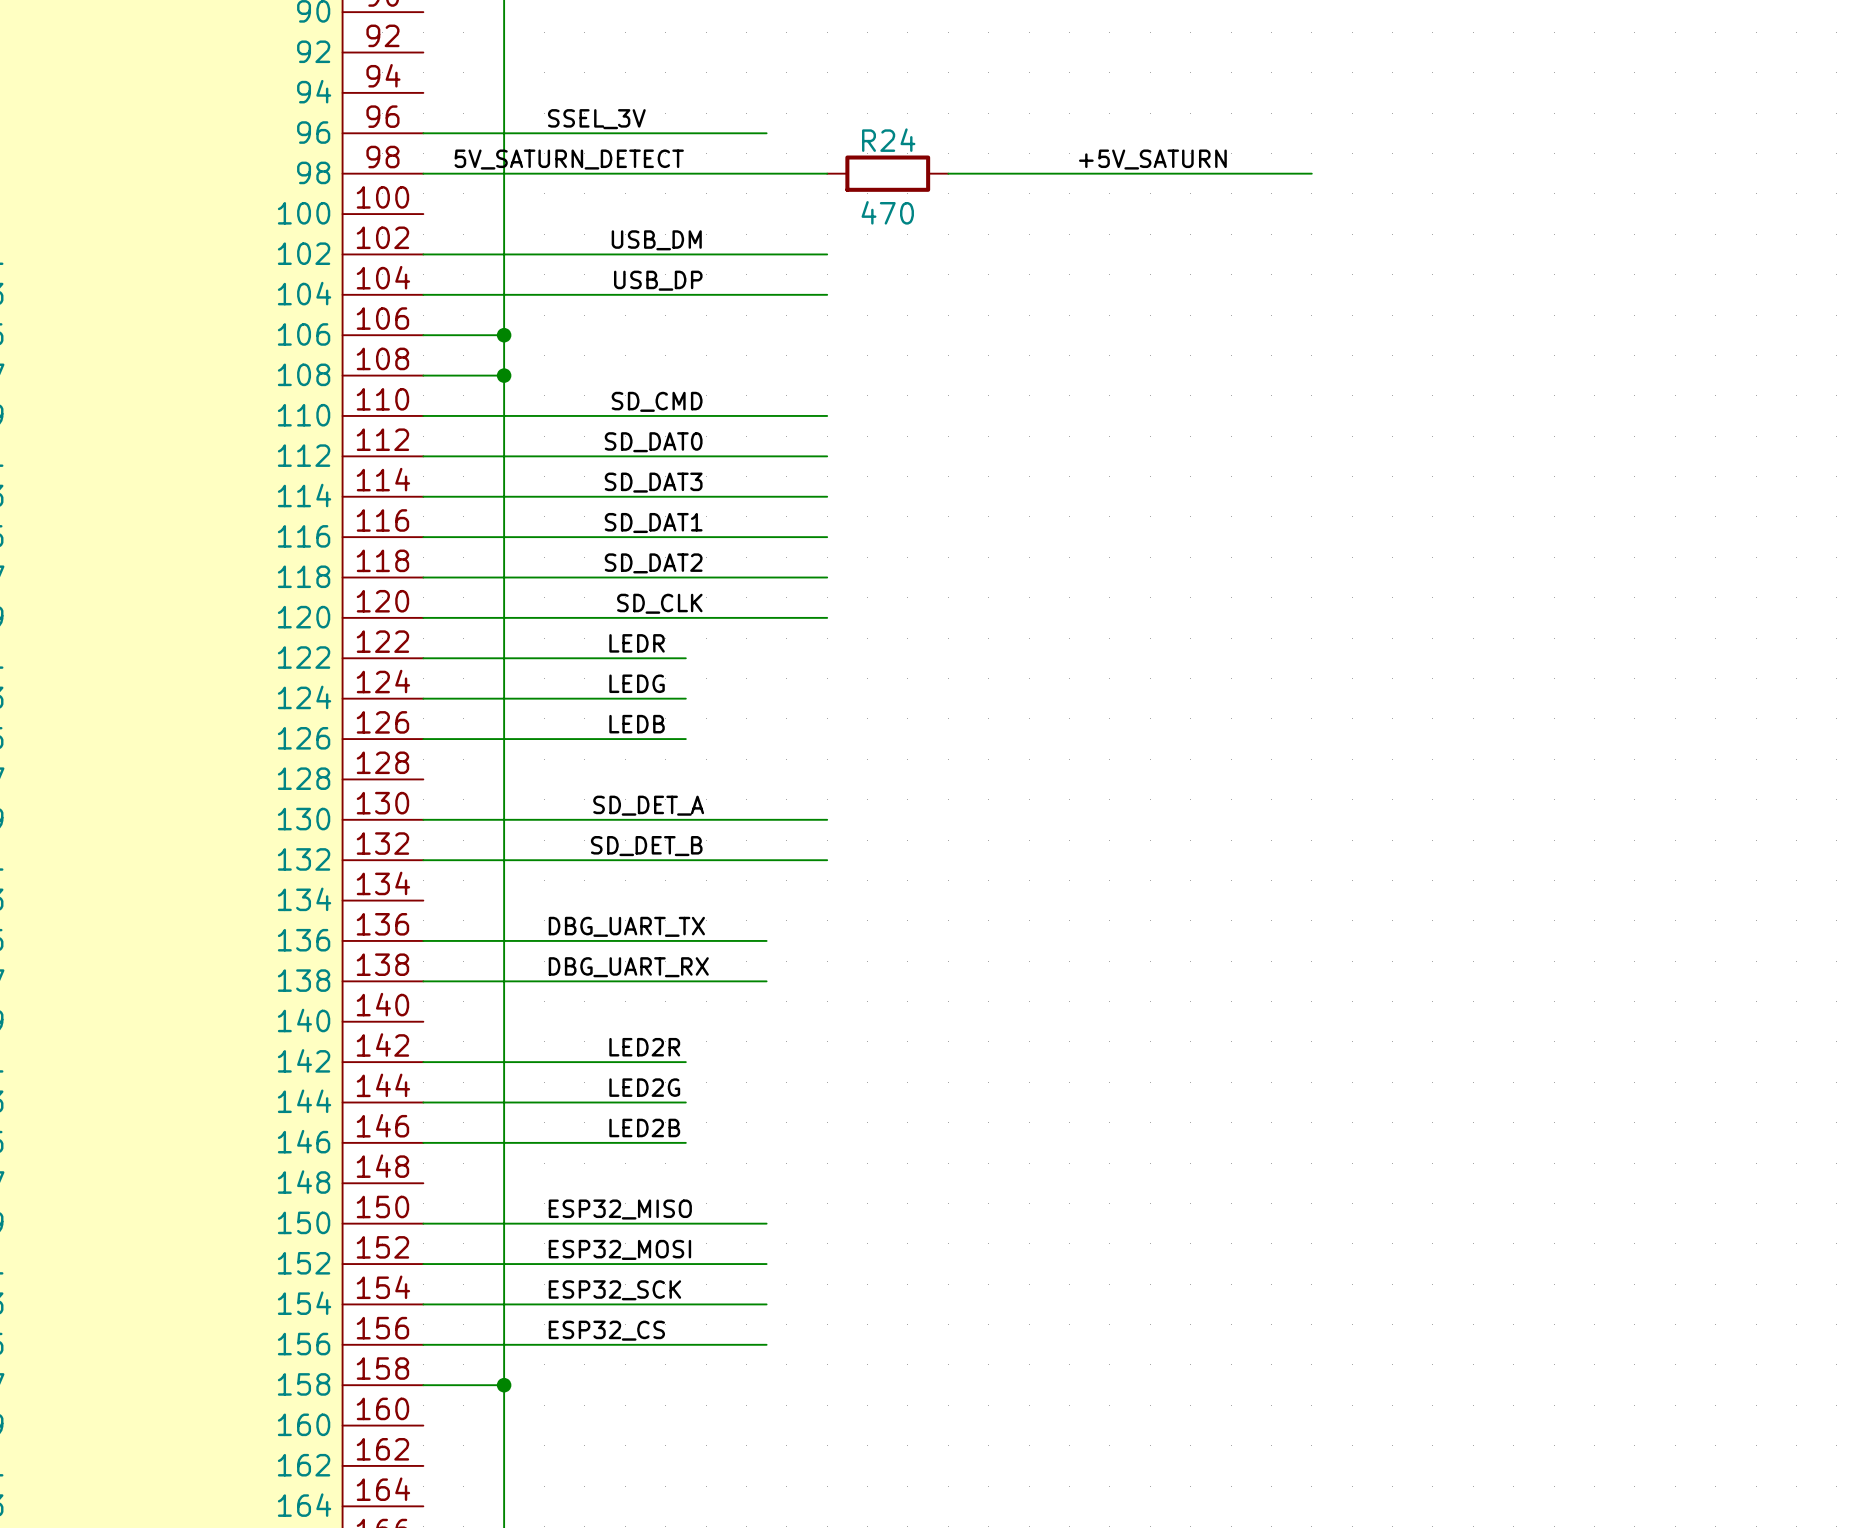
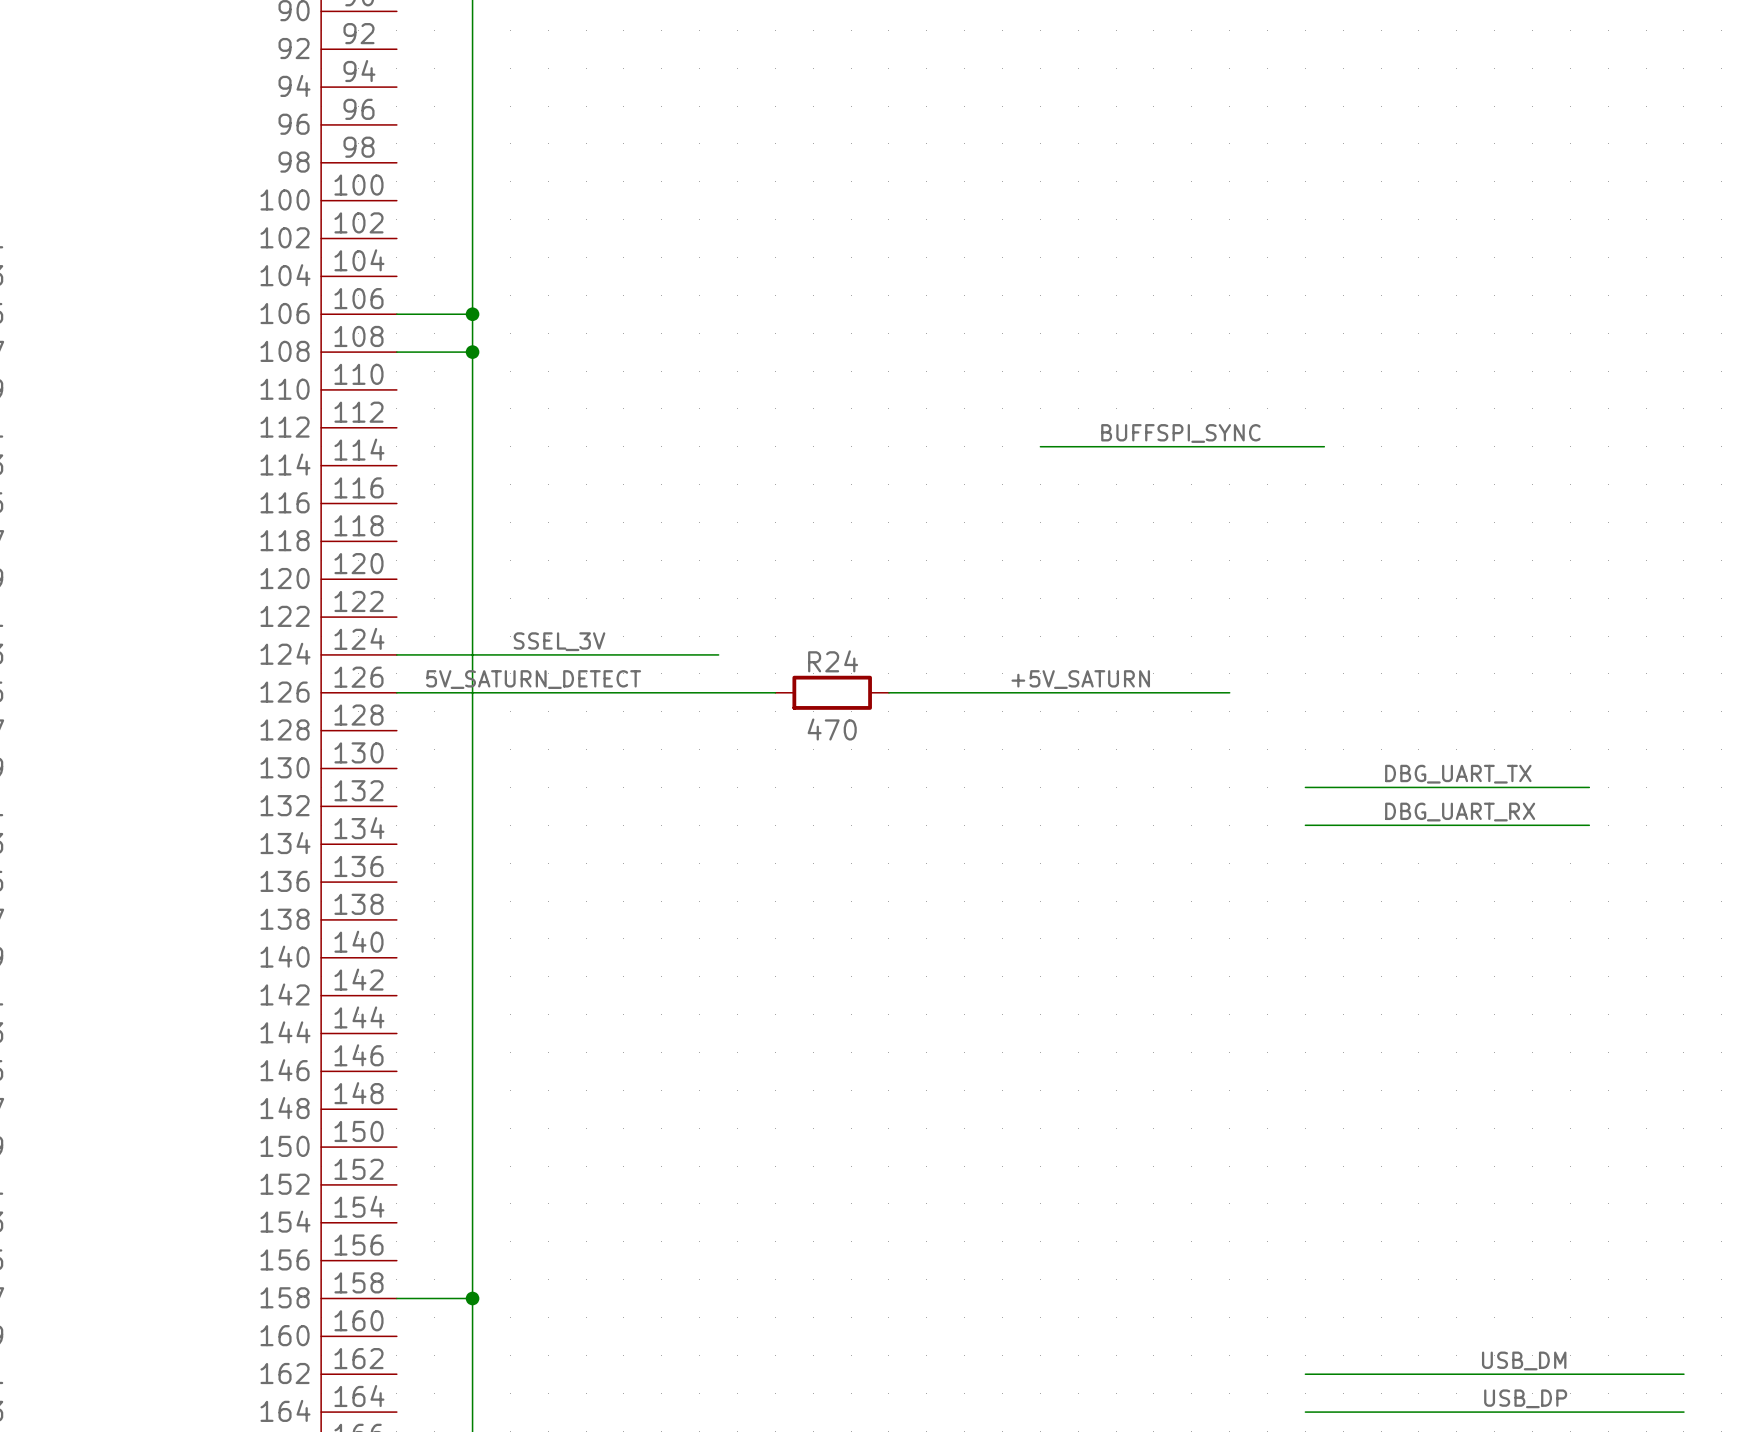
label: SSEL_3V (596, 119) -> none
wire: (423, 133) (766, 133) -> none
label: 5V_SATURN_DETECT (569, 159) -> none
label: +5V_SATURN (1152, 159) -> none
wire: (423, 173) (827, 173) -> none
R24 position: (887, 173) -> (832, 692)
wire: (948, 173) (1311, 173) -> none
label: USB_DM (656, 240) -> none
wire: (423, 254) (827, 254) -> none
label: USB_DP (658, 280) -> none
wire: (423, 294) (827, 294) -> none
label: SD_CMD (657, 401) -> none
wire: (423, 415) (827, 415) -> none
label: SD_DAT0 (653, 442) -> none
wire: (423, 456) (827, 456) -> none
label: none -> BUFFSPI_SYNC (1180, 433)
wire: none -> (1040, 446) (1324, 446)
label: SD_DAT3 (653, 482) -> none
wire: (423, 496) (827, 496) -> none
label: SD_DAT1 (653, 522) -> none
wire: (423, 537) (827, 537) -> none
label: SD_DAT2 (653, 563) -> none
wire: (423, 577) (827, 577) -> none
label: SD_CLK (659, 603) -> none
wire: (423, 617) (827, 617) -> none
label: LEDR (637, 643) -> none
wire: (423, 658) (685, 658) -> none
label: LEDG (637, 683) -> none
label: none -> SSEL_3V (559, 641)
wire: none -> (642, 654) (718, 654)
label: none -> 5V_SATURN_DETECT (533, 679)
label: LEDB (637, 724) -> none
label: none -> +5V_SATURN (1080, 679)
wire: none -> (642, 692) (775, 692)
wire: none -> (888, 692) (1229, 692)
label: SD_DET_A (648, 805) -> none
wire: (423, 819) (827, 819) -> none
label: none -> DBG_UART_TX (1458, 774)
wire: none -> (1305, 787) (1589, 787)
label: SD_DET_B (646, 846) -> none
wire: (423, 860) (827, 860) -> none
label: none -> DBG_UART_RX (1460, 812)
wire: none -> (1305, 825) (1589, 825)
label: DBG_UART_TX (626, 926) -> none
wire: (423, 940) (766, 940) -> none
label: DBG_UART_RX (628, 967) -> none
wire: (423, 981) (766, 981) -> none
label: LED2R (644, 1047) -> none
wire: (423, 1062) (685, 1062) -> none
label: LED2G (644, 1087) -> none
wire: (423, 1102) (685, 1102) -> none
label: LED2B (644, 1127) -> none
wire: (423, 1142) (685, 1142) -> none
label: ESP32_MISO (620, 1209) -> none
wire: (423, 1223) (766, 1223) -> none
label: ESP32_MOSI (619, 1249) -> none
wire: (423, 1264) (766, 1264) -> none
label: ESP32_SCK (614, 1290) -> none
wire: (423, 1304) (766, 1304) -> none
label: ESP32_CS (606, 1330) -> none
wire: (423, 1344) (766, 1344) -> none
label: none -> USB_DM (1524, 1360)
wire: none -> (1305, 1374) (1683, 1374)
label: none -> USB_DP (1525, 1398)
wire: none -> (1305, 1412) (1683, 1412)

